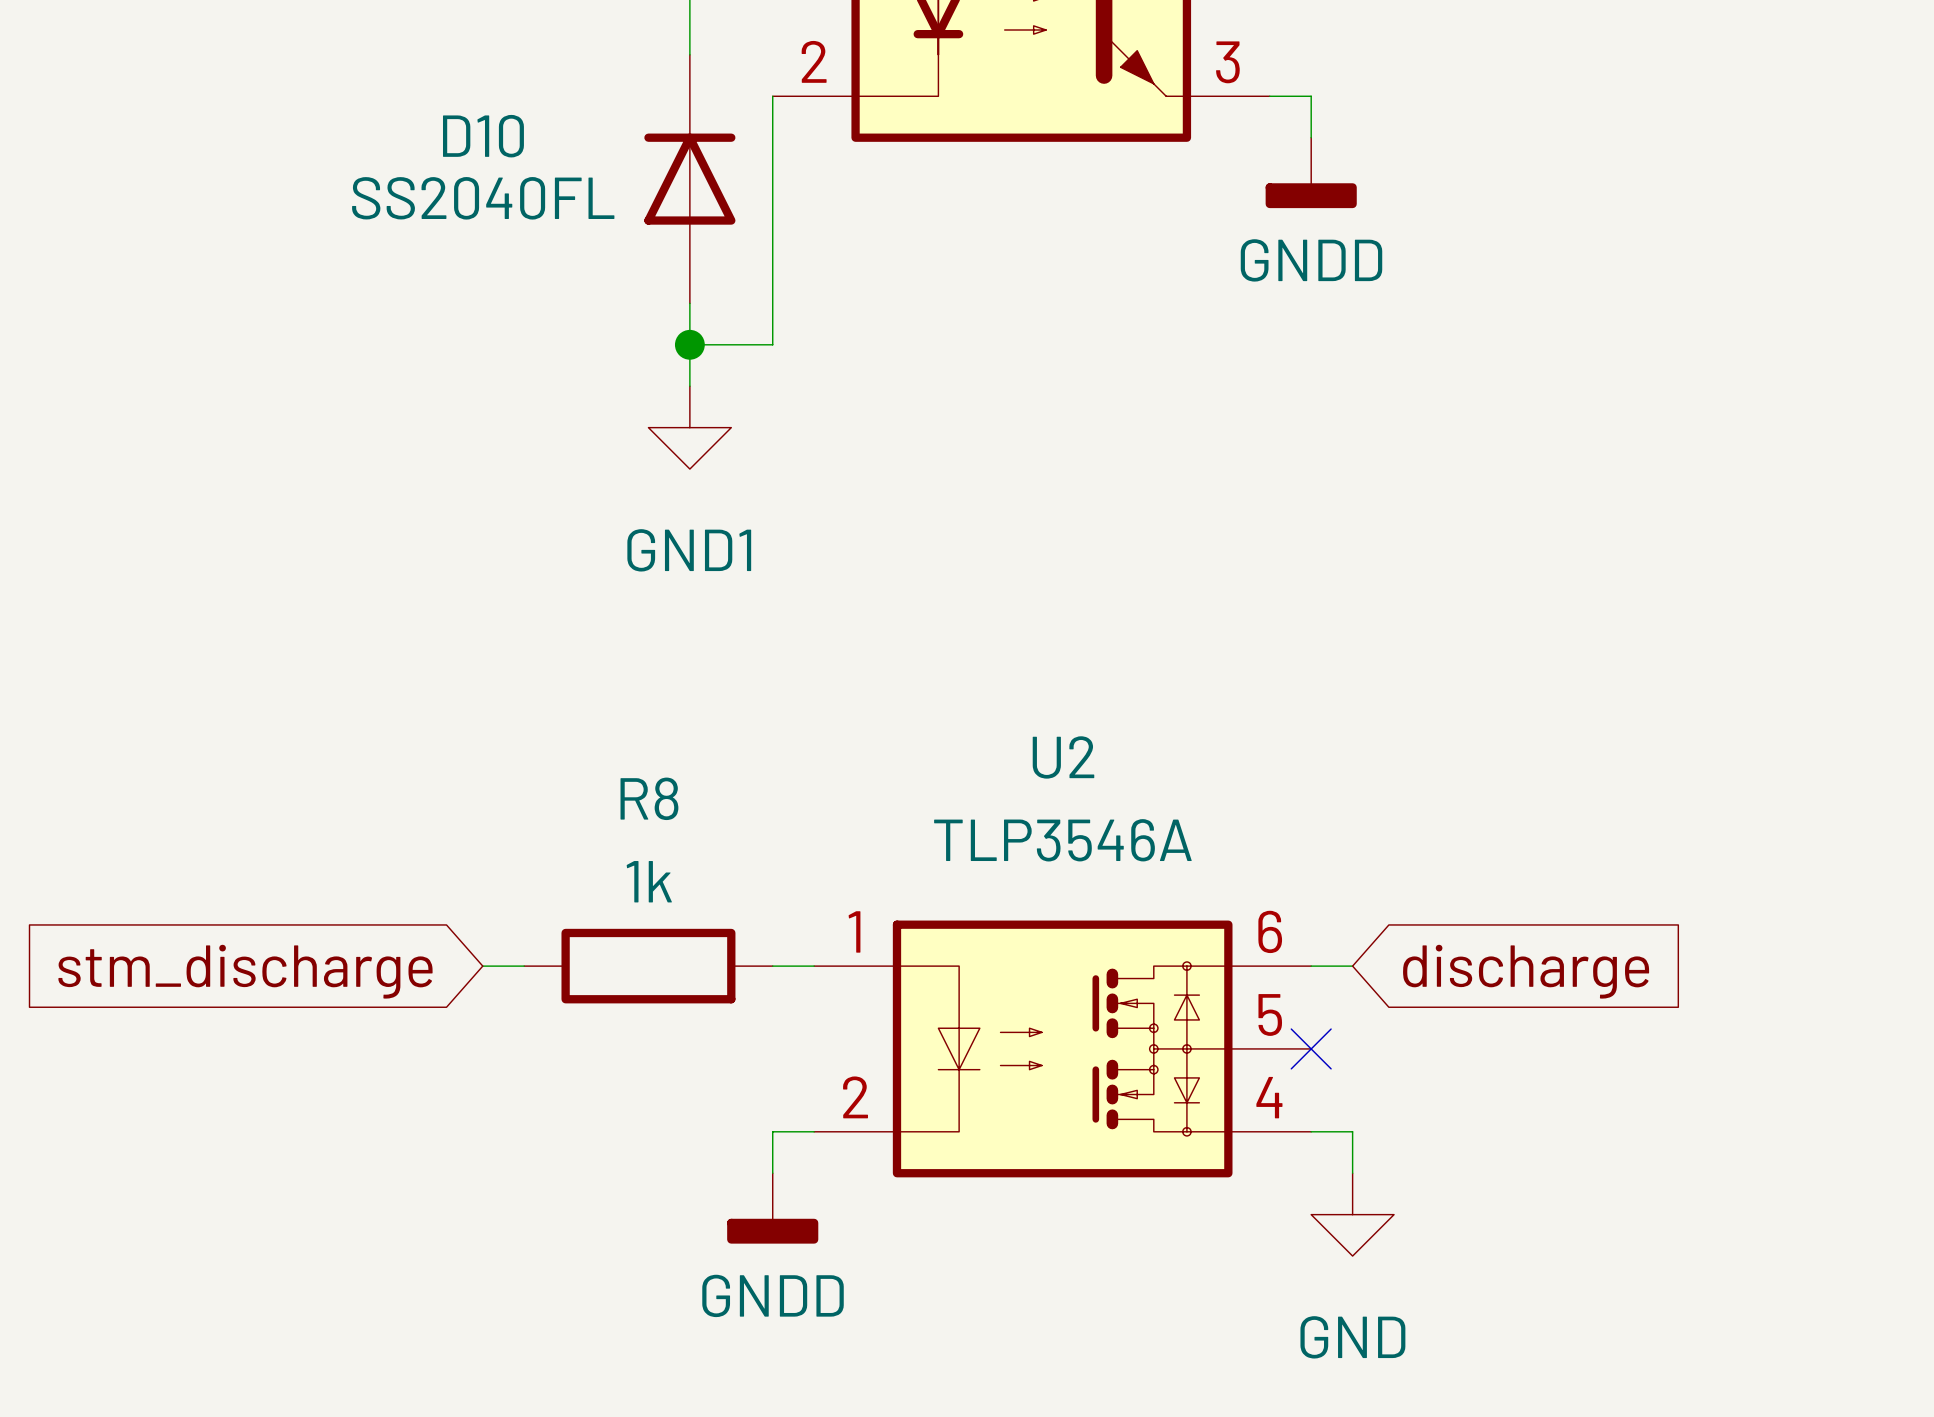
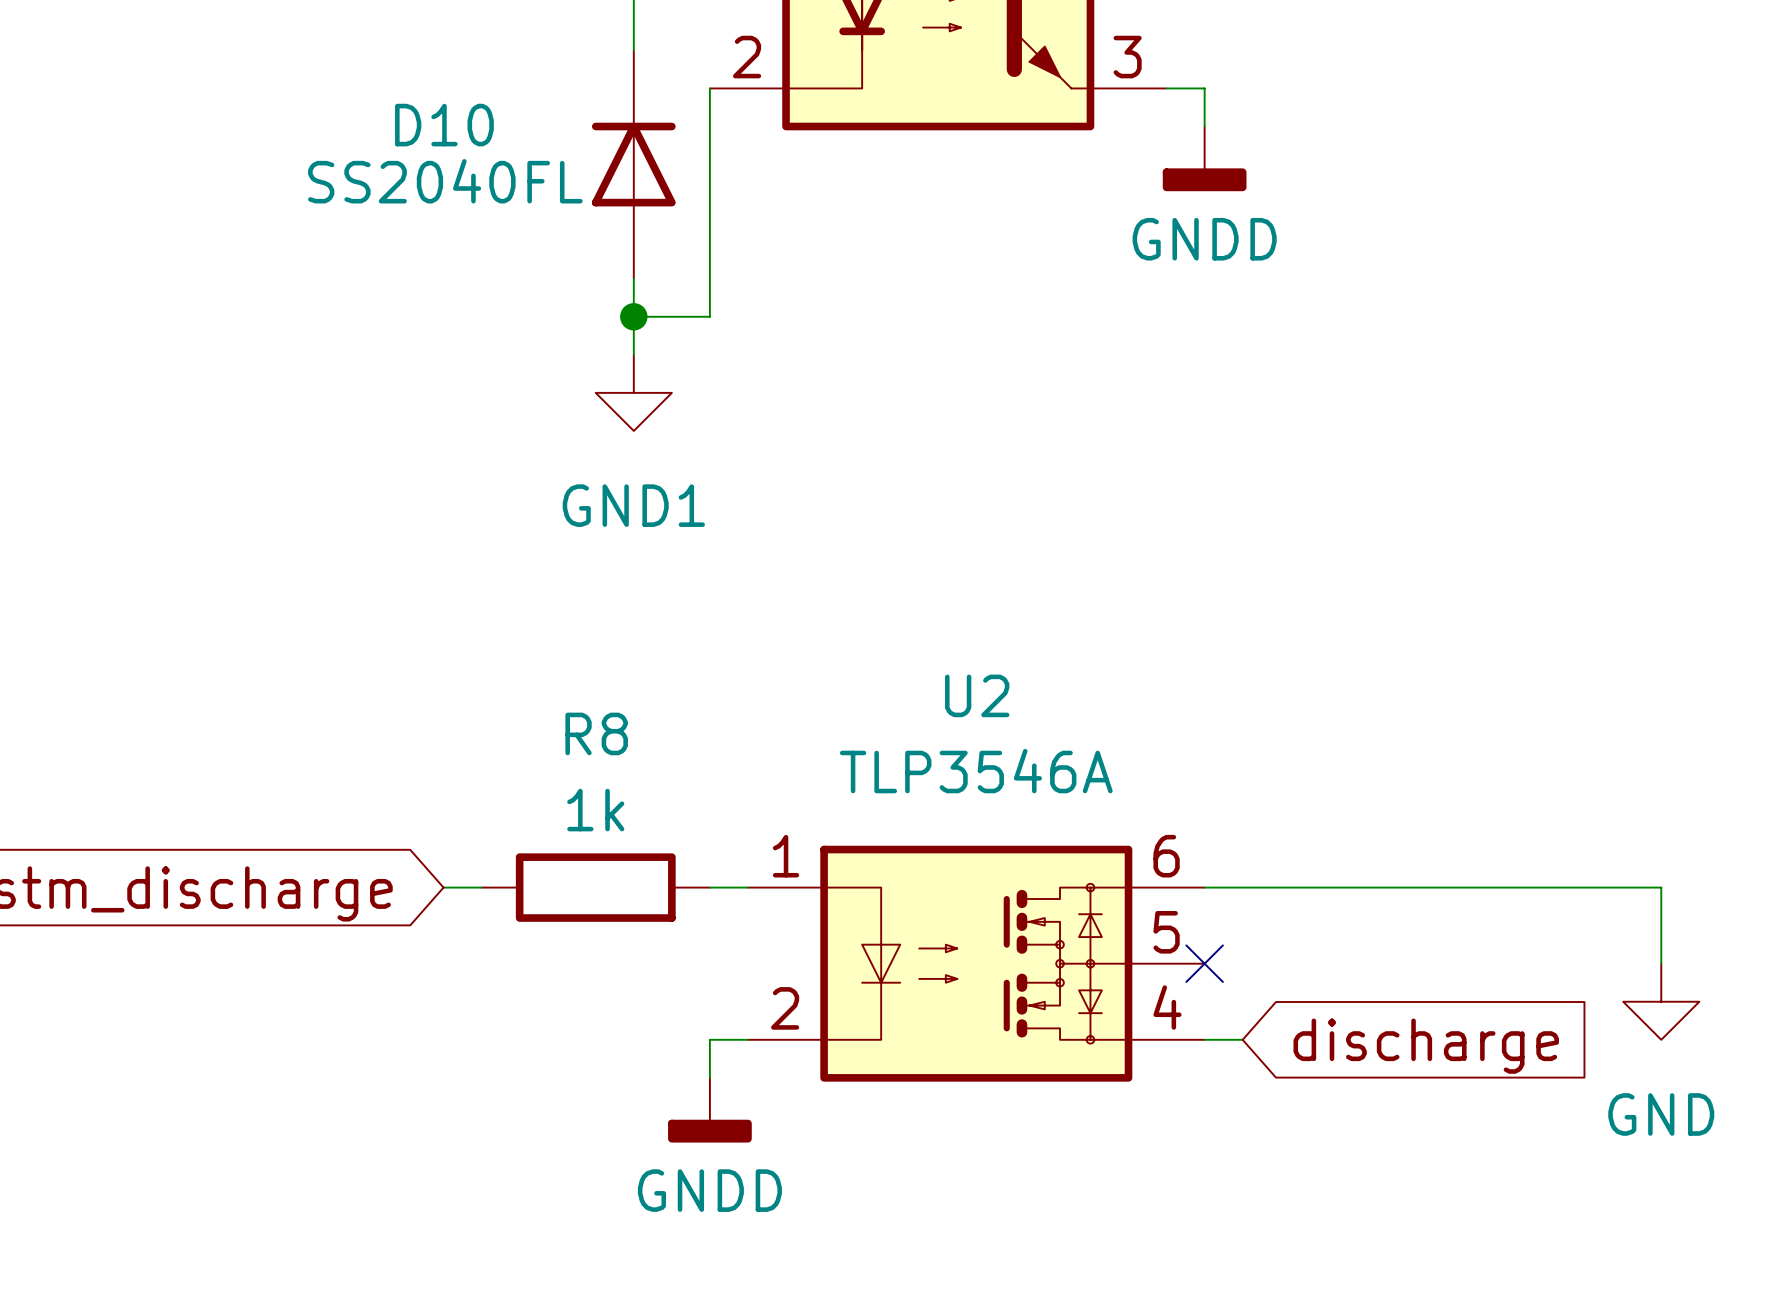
wire: none -> (1242, 887) (1661, 887) (1661, 963)
global label position: discharge (1526, 971) -> discharge (1426, 1046)
wire: (1352, 1131) (1352, 1173) -> none
power symbol position: GND (1352, 1214) -> GND (1661, 1001)

